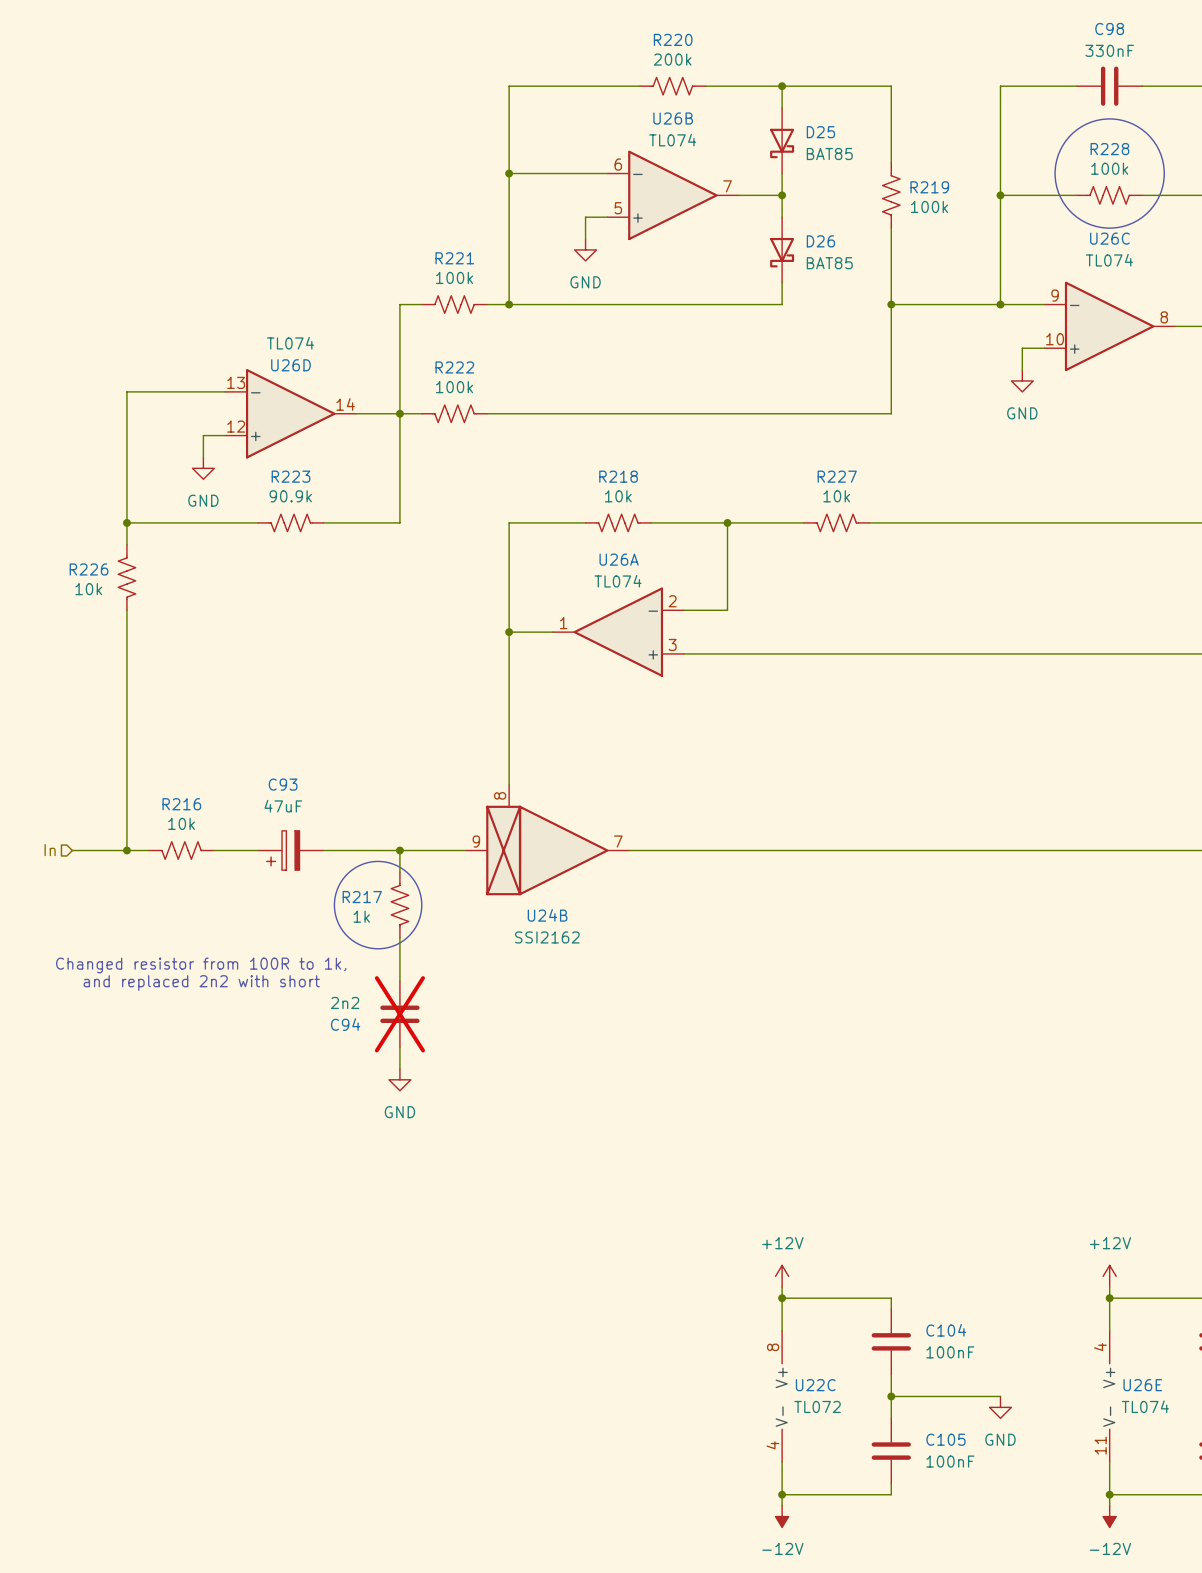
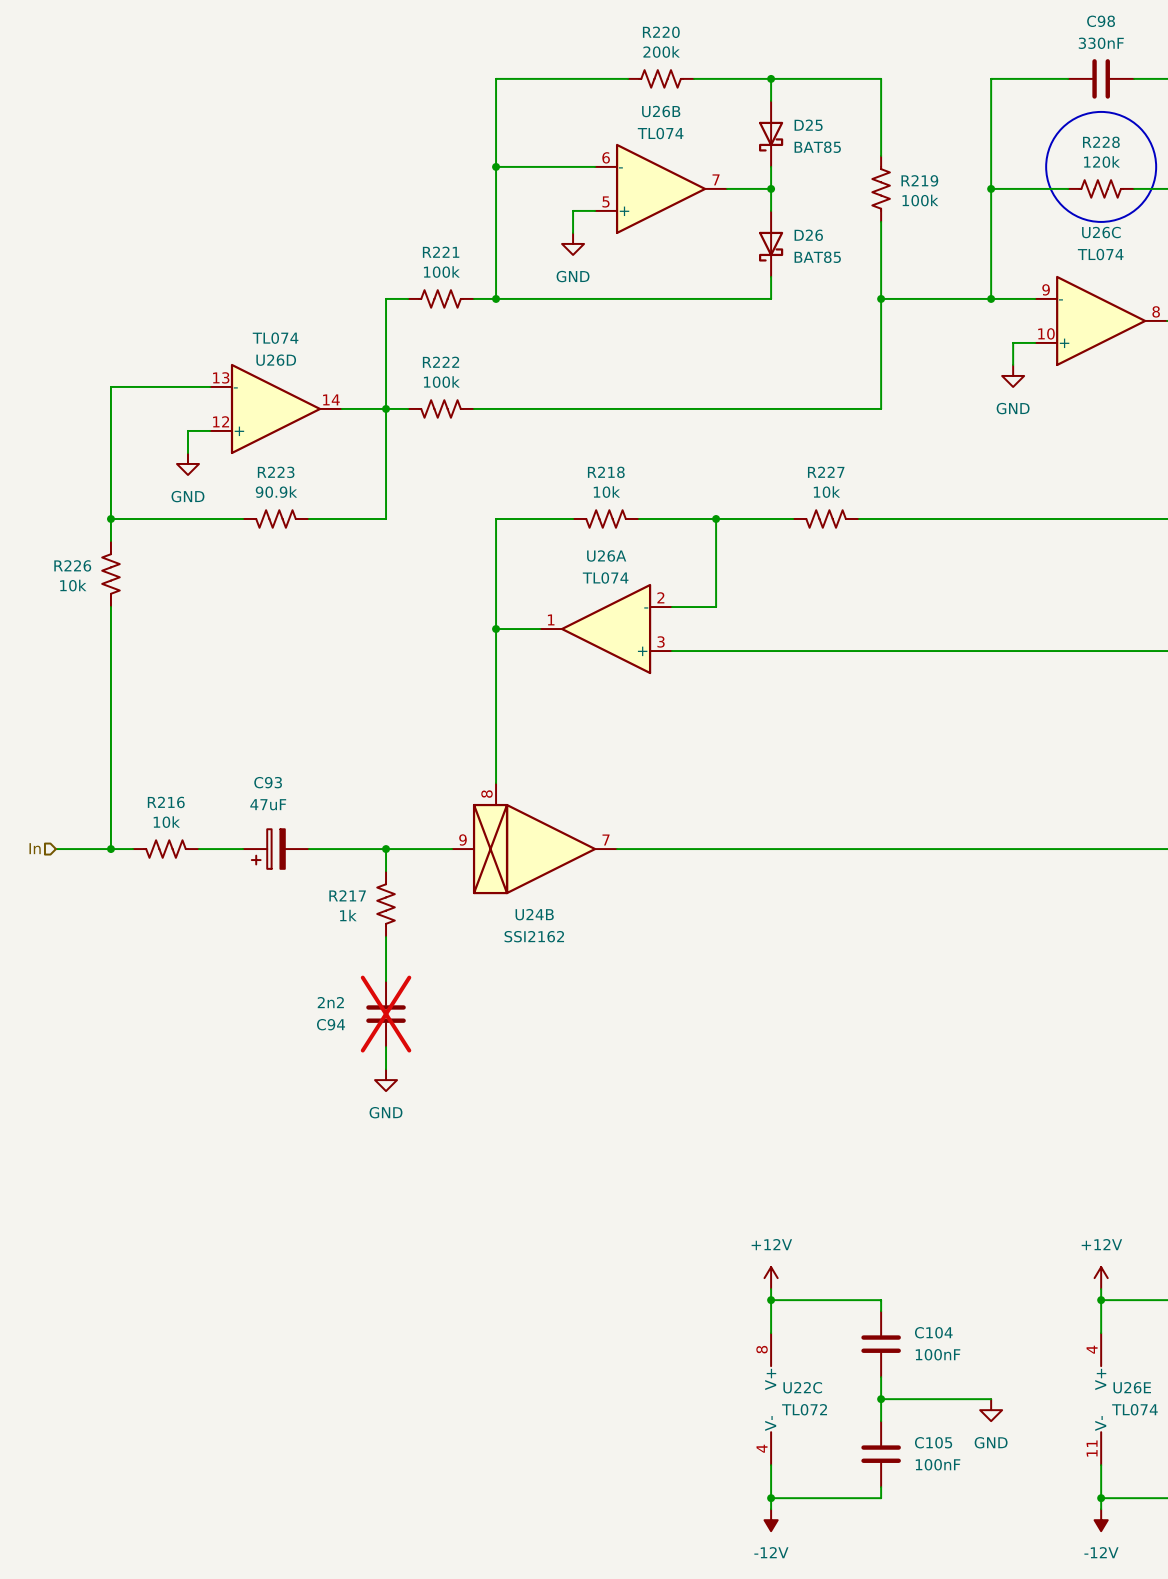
R228 value: 100k (1109, 168) -> 120k (1101, 161)
drawing: [334, 861, 422, 949] -> none
text: Changed resistor from 100R to 1k, (201, 965) -> none
text: and replaced 2n2 with short (201, 983) -> none

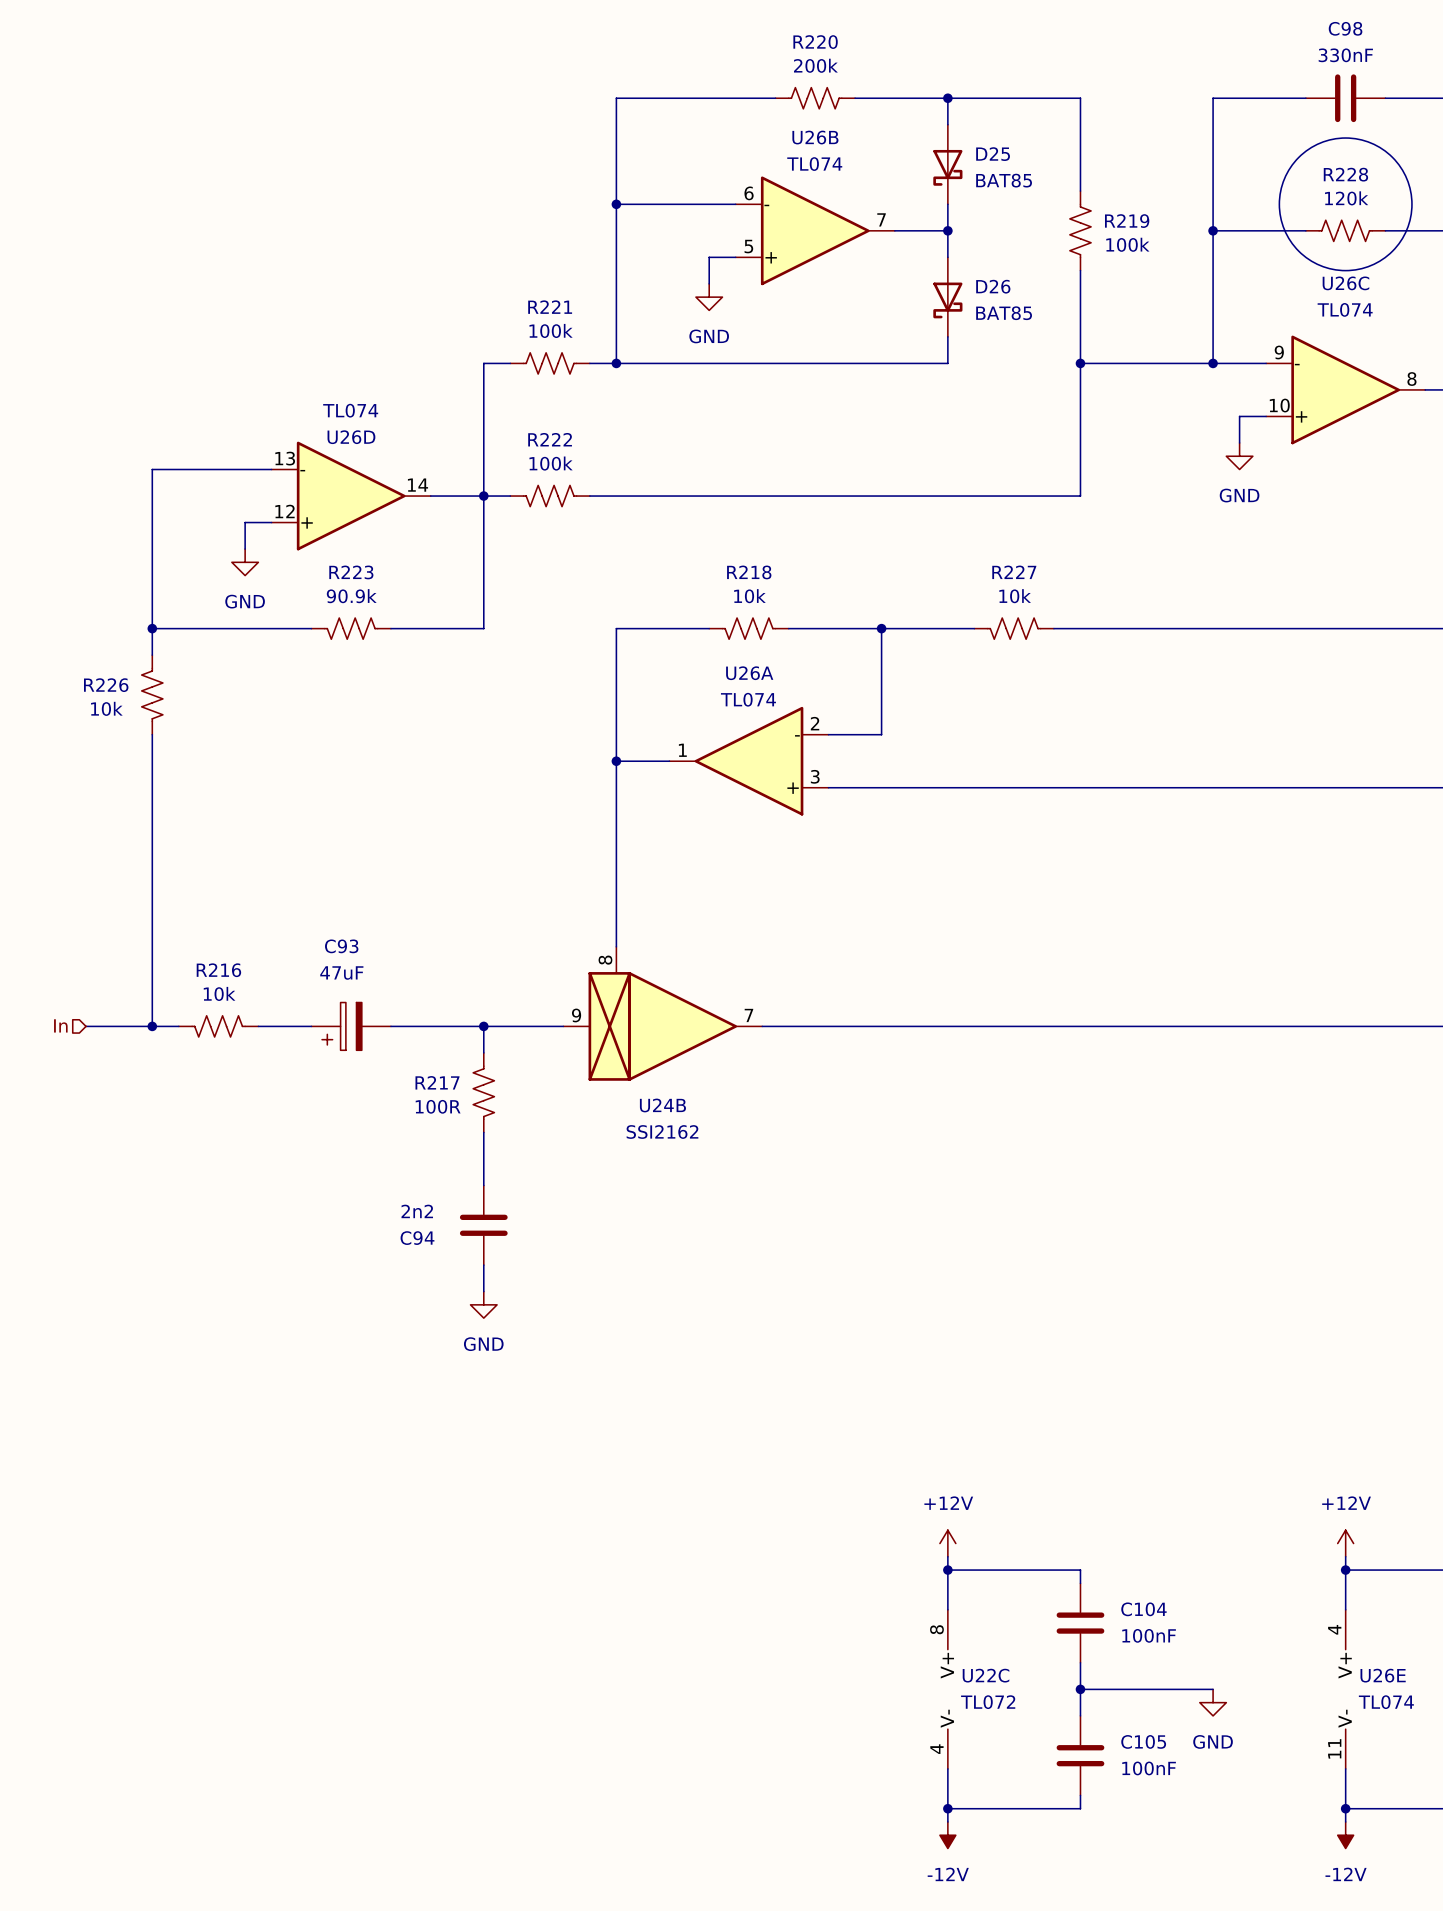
R217 value: 1k (348, 915) -> 100R (438, 1106)
C94 do-not-place cross: (386, 1014) -> none

